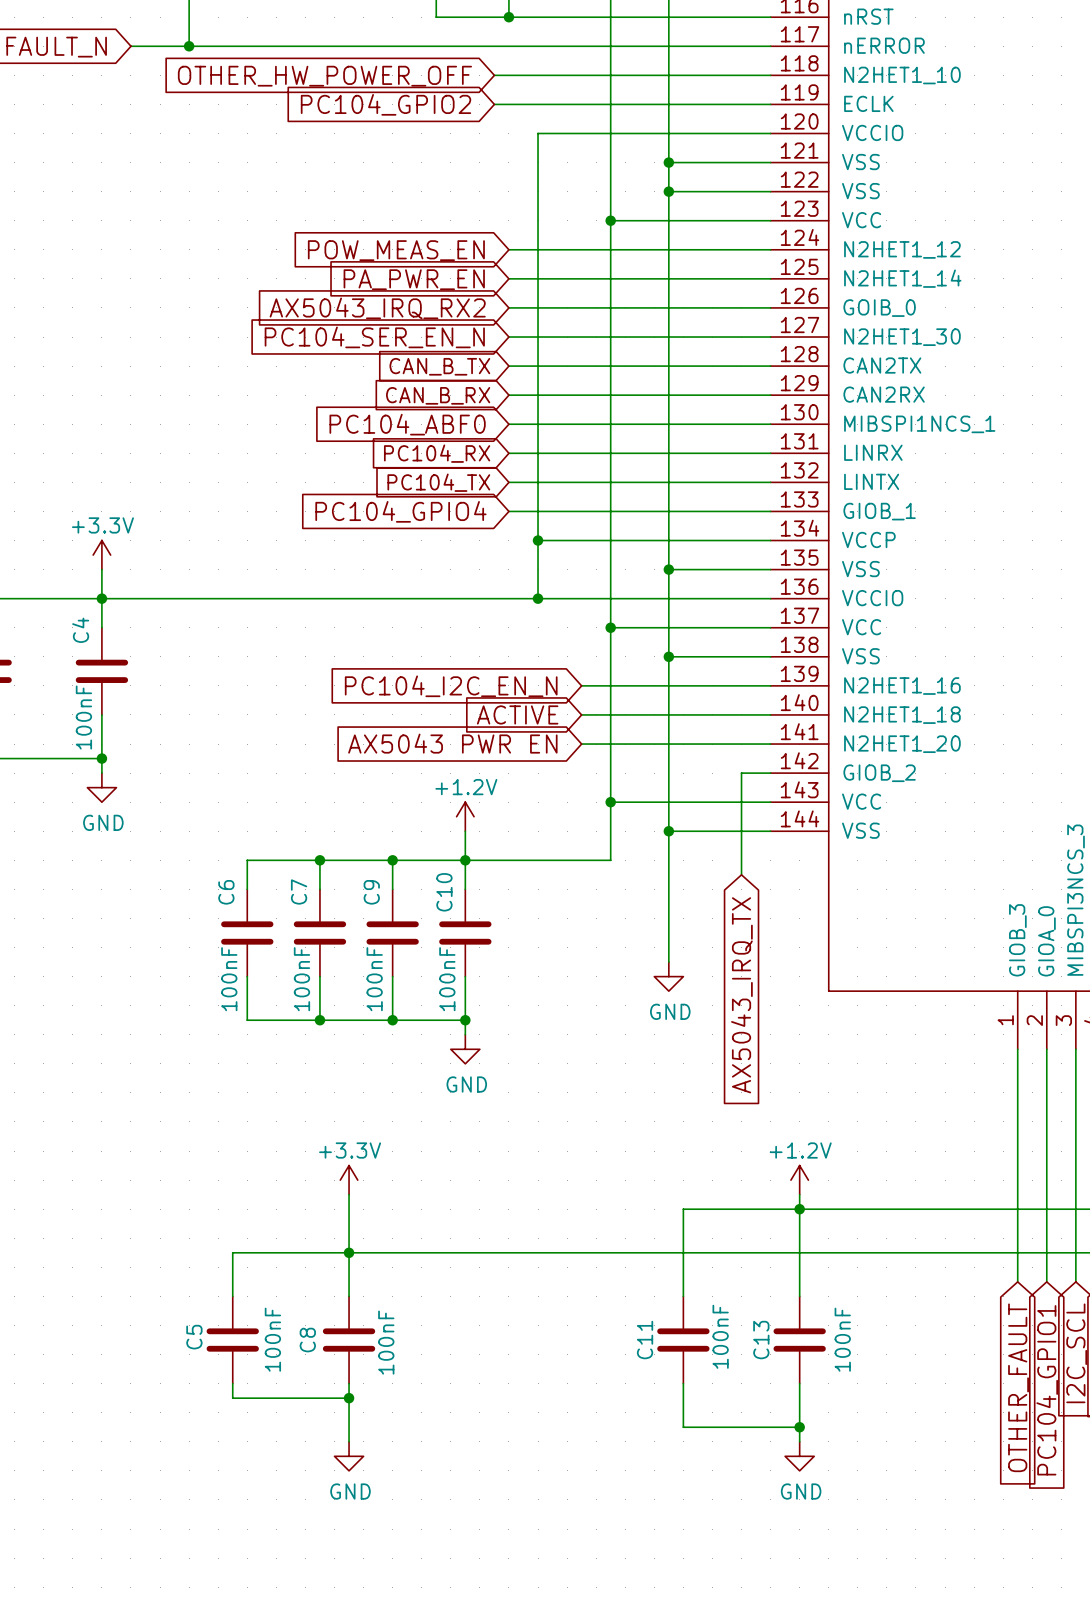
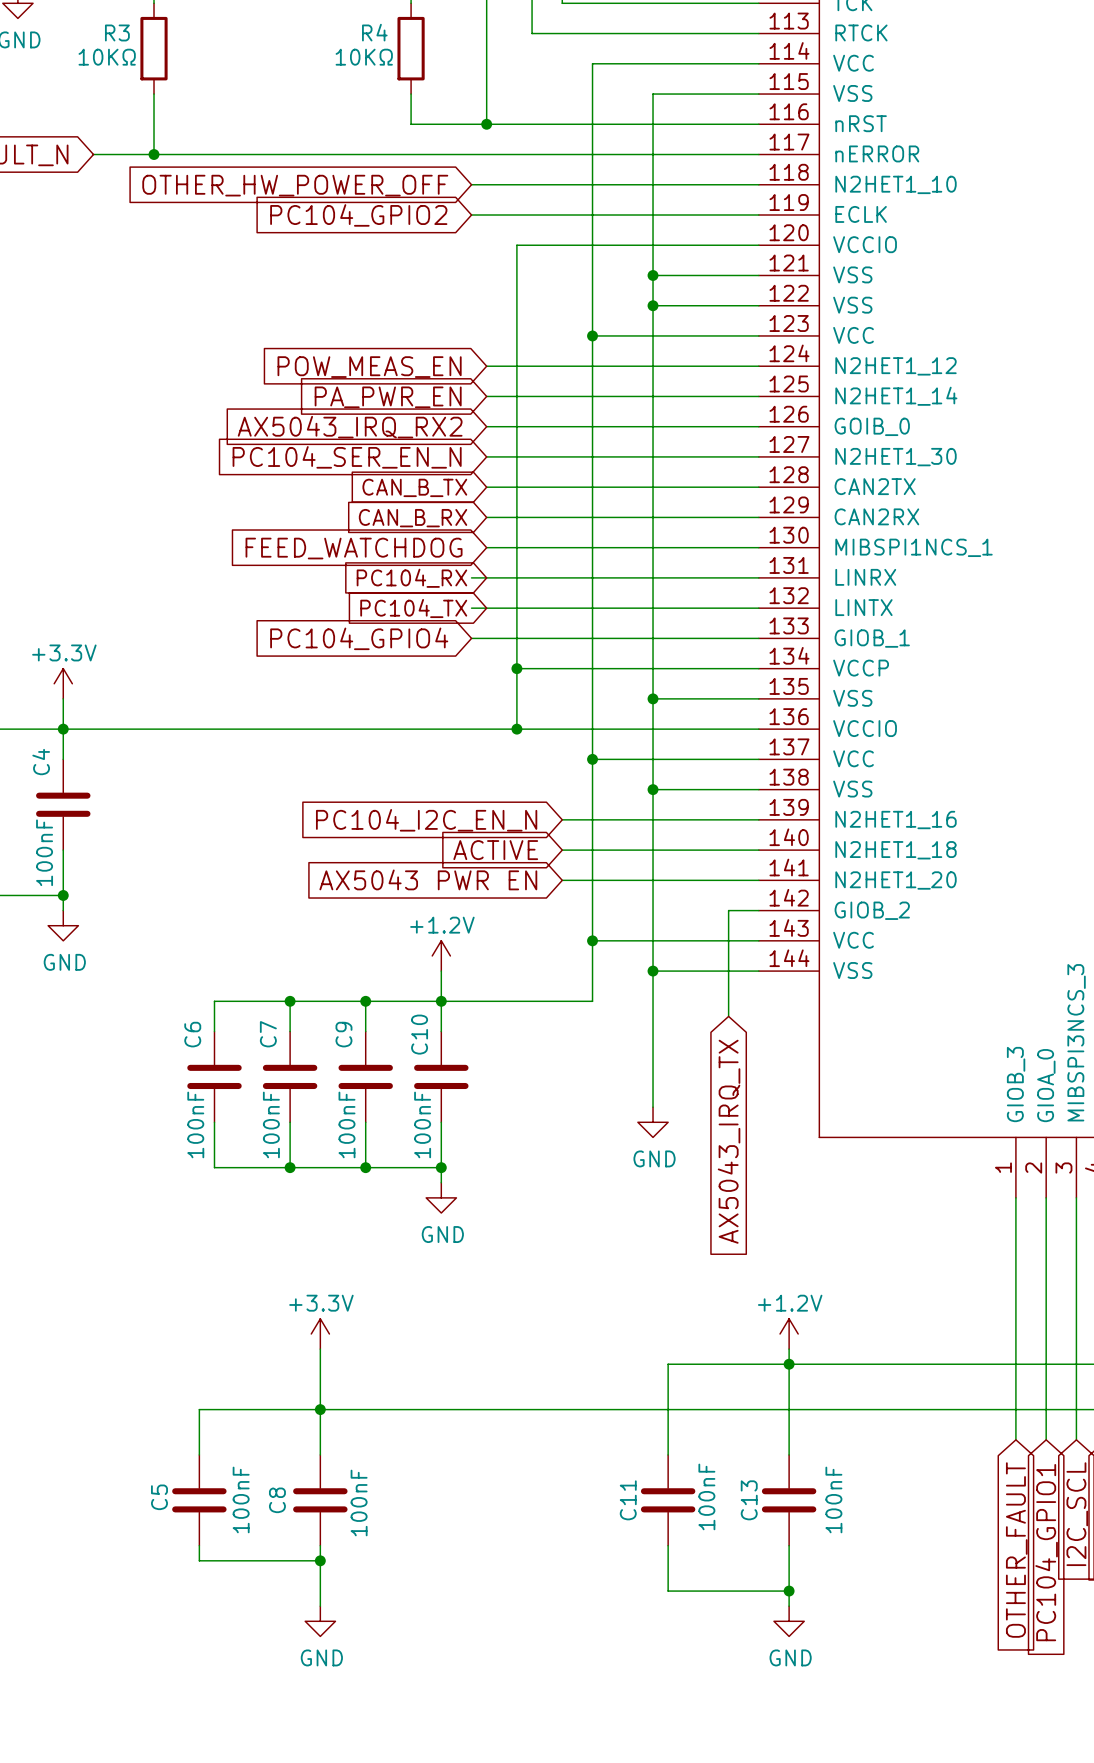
global label: PC104_ABF0 (407, 424) -> FEED_WATCHDOG (354, 548)
wire: none -> (471, 577) (486, 577)
wire: none -> (471, 608) (486, 608)
global label position: PC104_GPIO4 (400, 511) -> PC104_GPIO4 (359, 638)
wire: none -> (471, 638) (486, 638)

